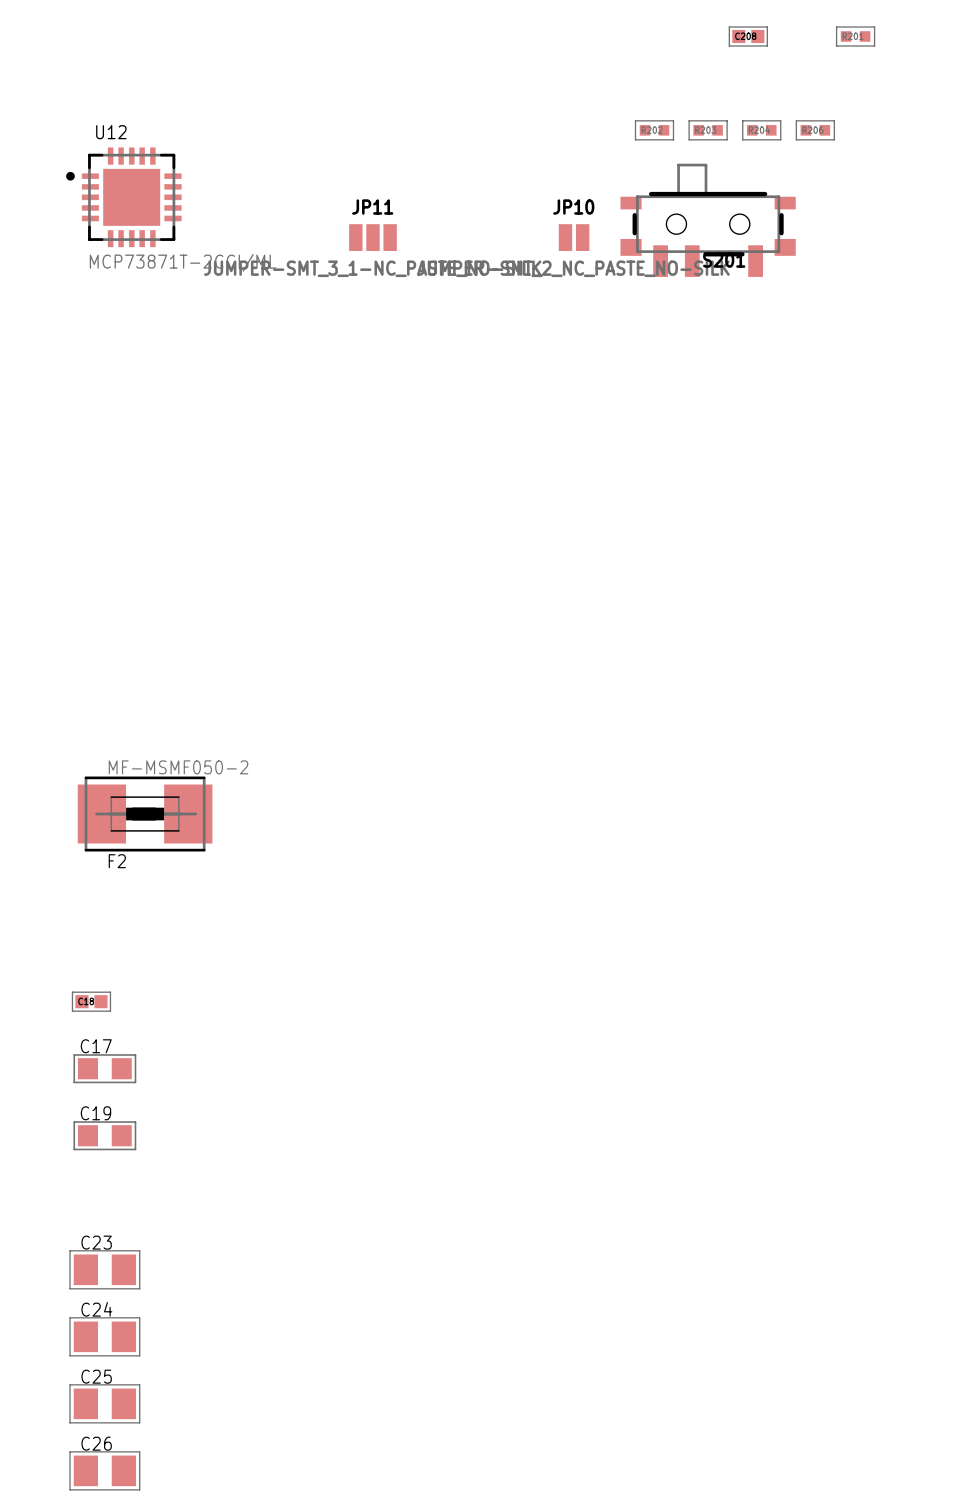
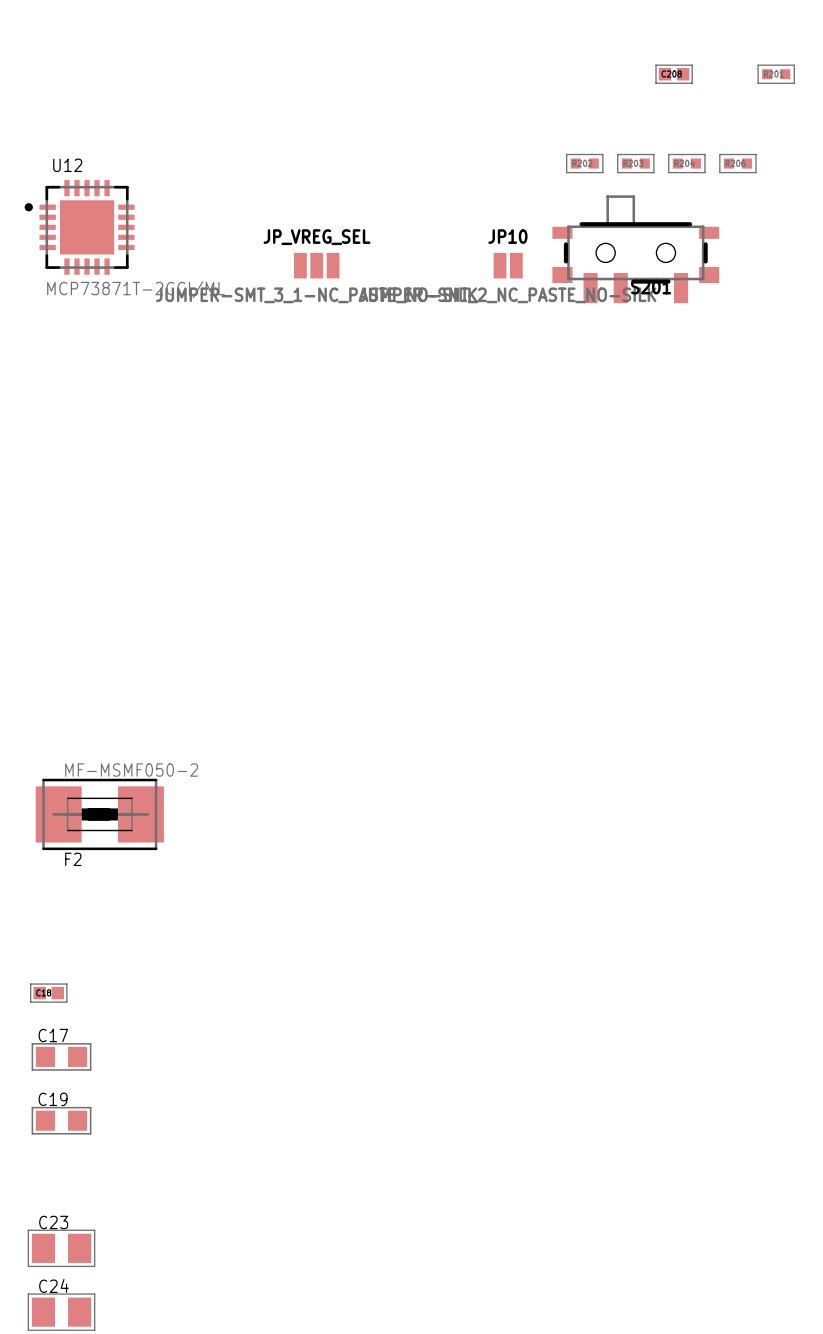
JP11 name: JP11 (372, 207) -> JP_VREG_SEL (317, 237)

